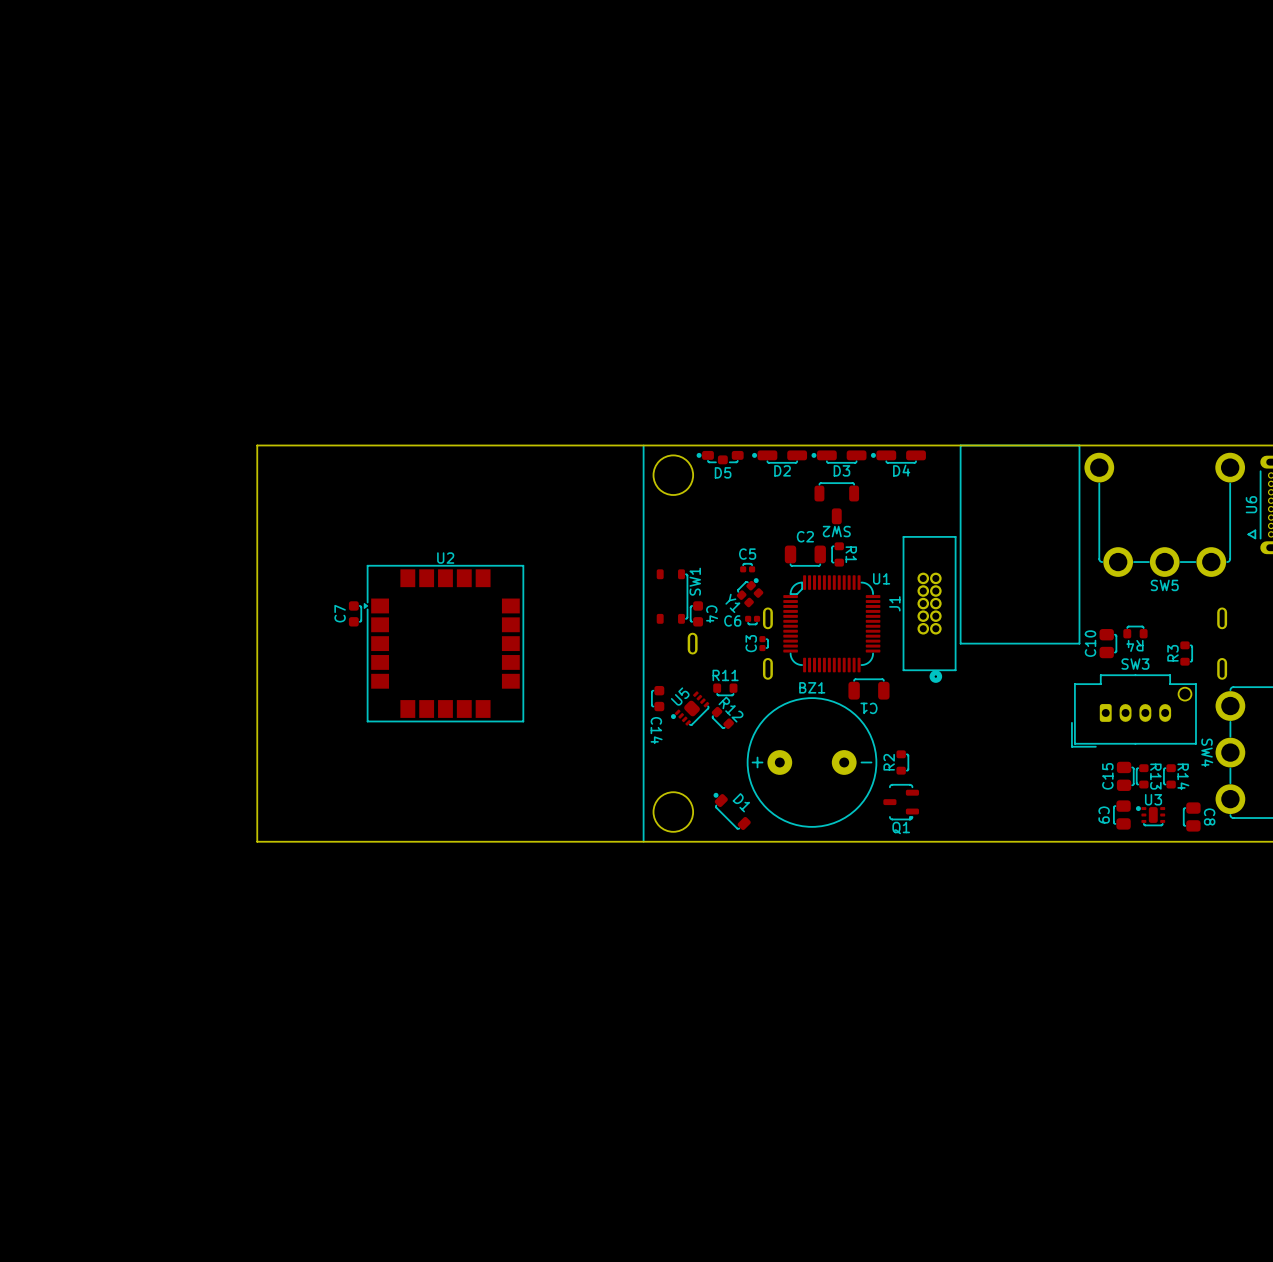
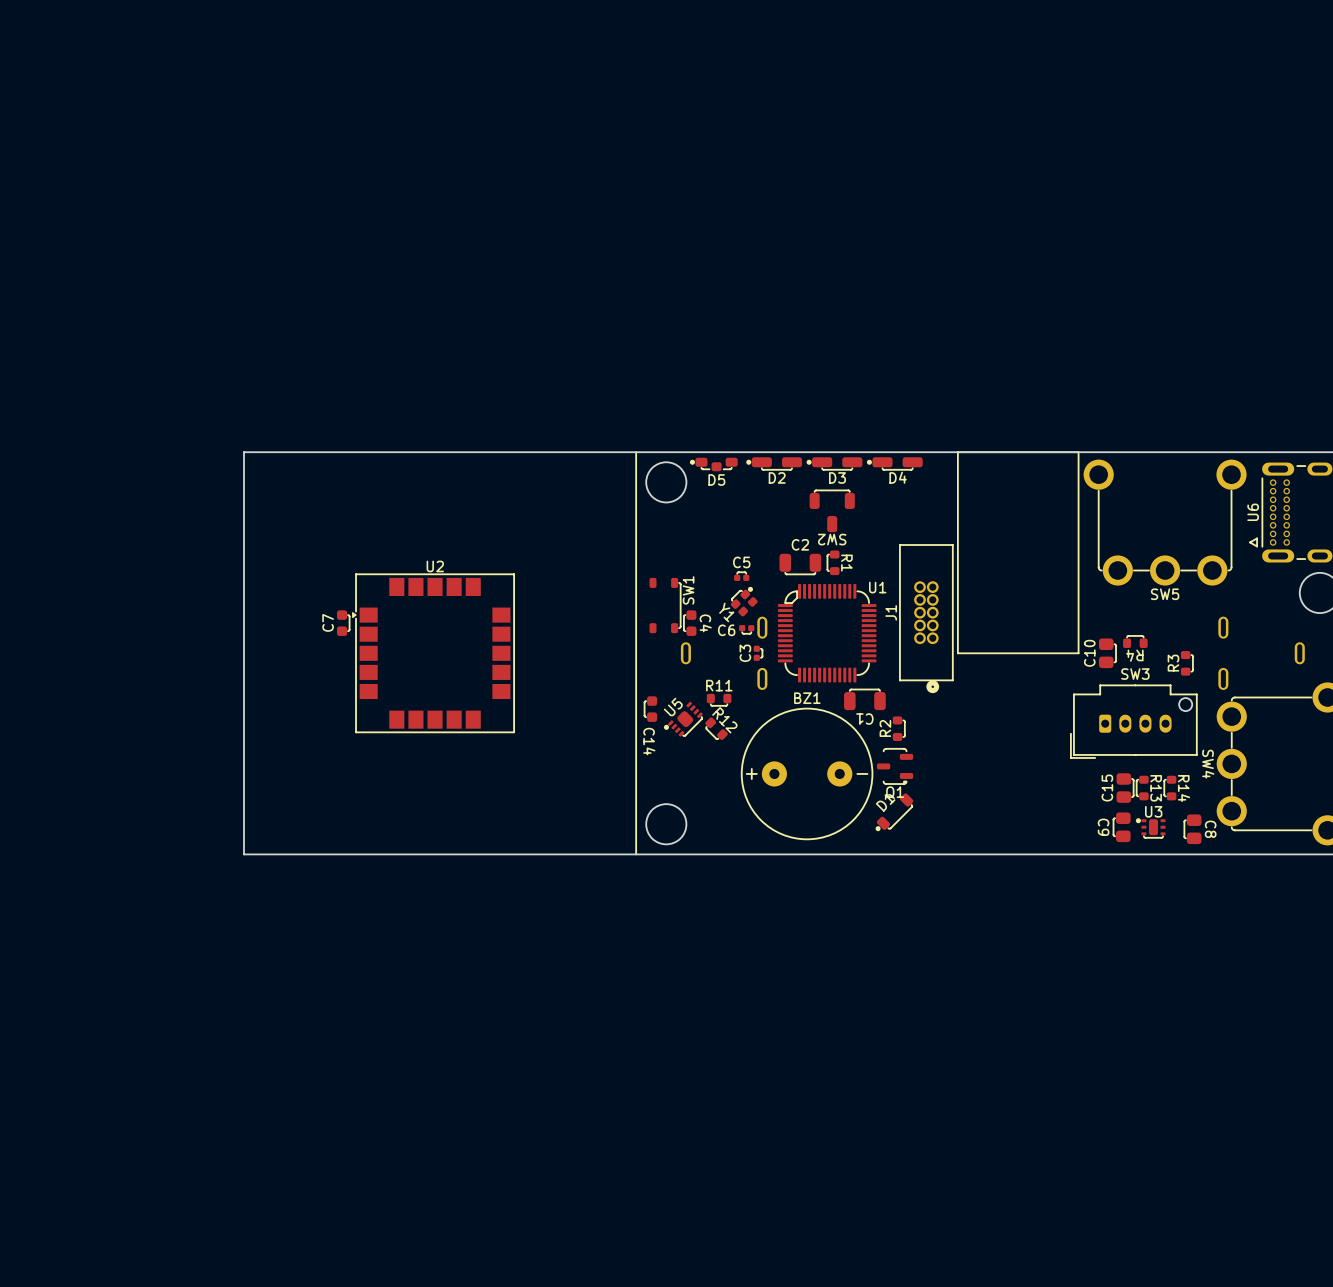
R2 position: (902, 762) -> (899, 728)
Q1 position: (901, 802) -> (895, 766)
D1 rotation: 0° (732, 811) -> 90° counterclockwise (894, 812)
D1 position: (732, 811) -> (894, 812)

